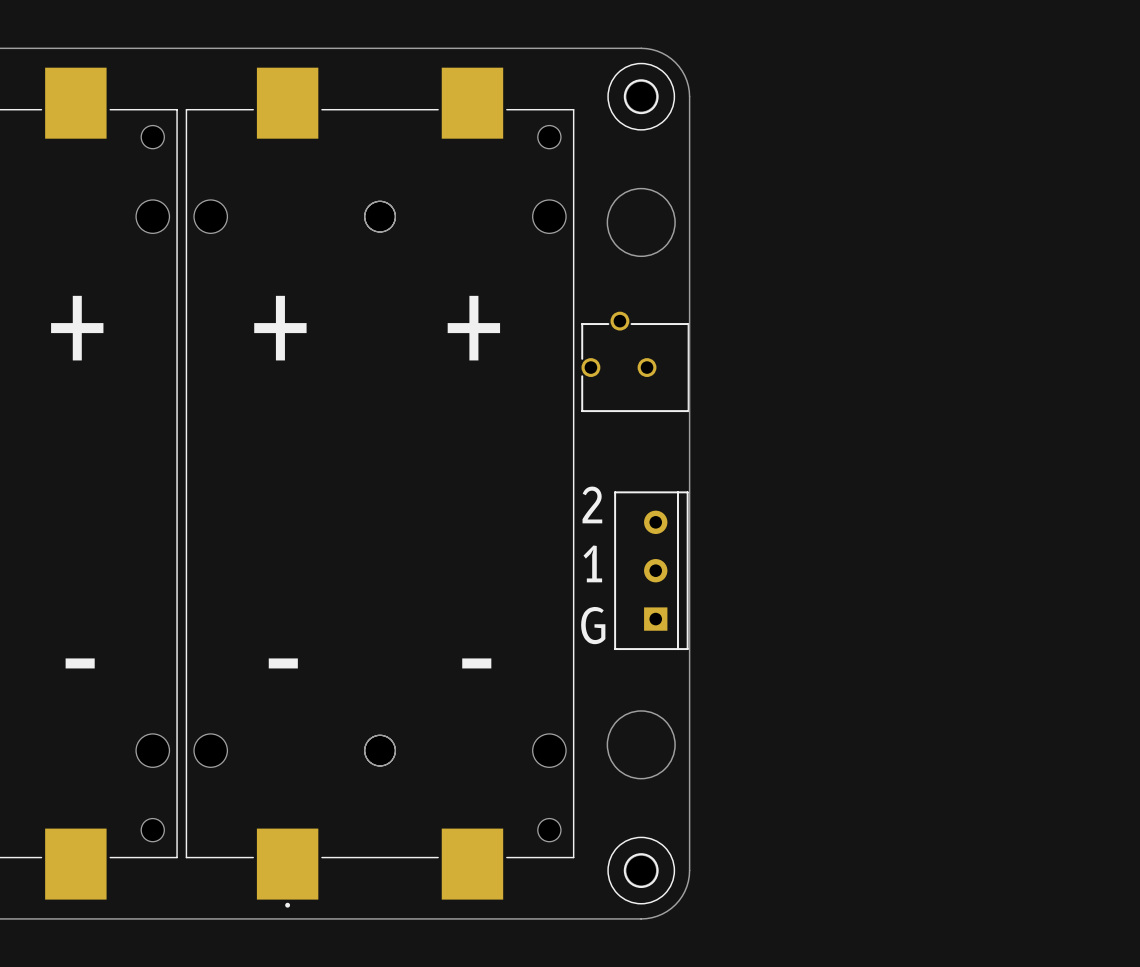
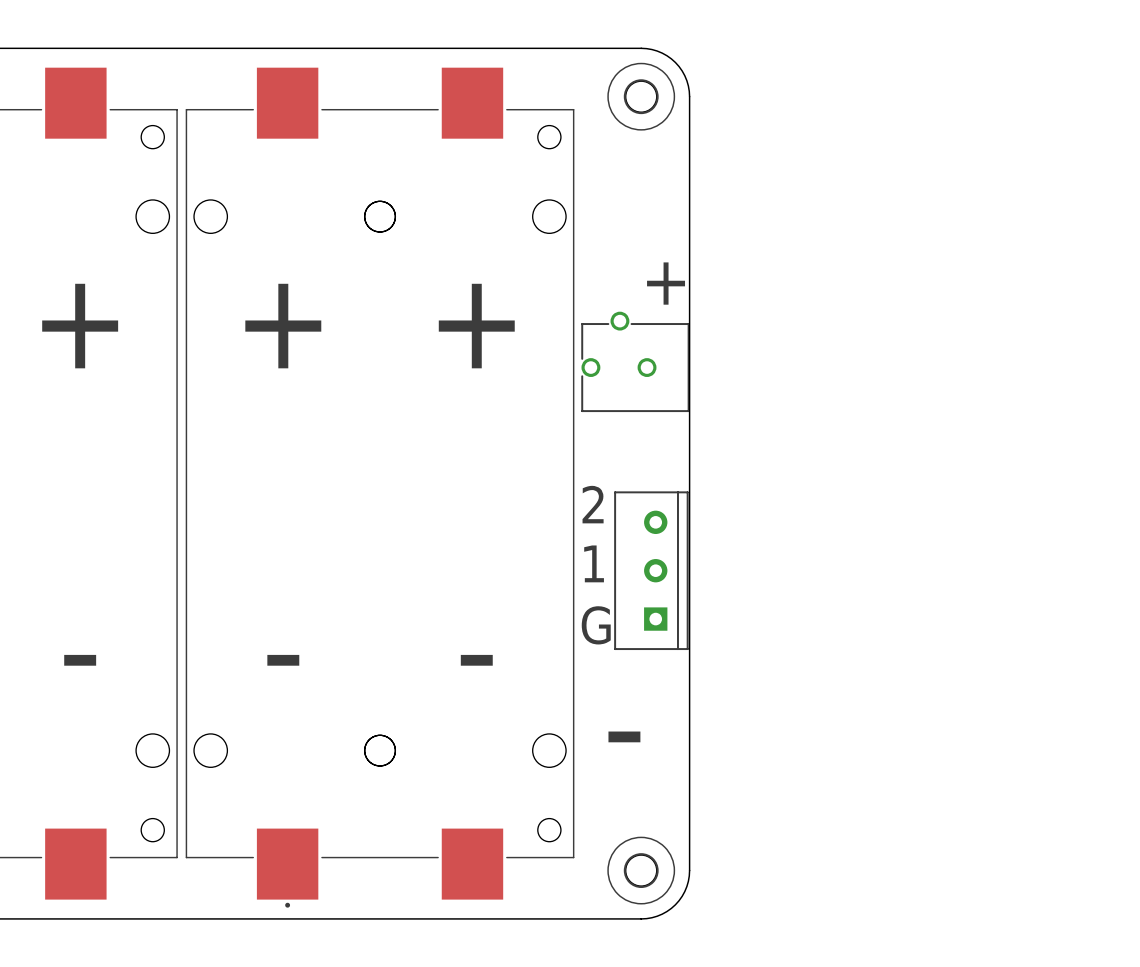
round board edge: [606, 187, 676, 258] -> none
text: none -> + (666, 283)
round board edge: [606, 710, 676, 780] -> none
text: none -> - (624, 736)

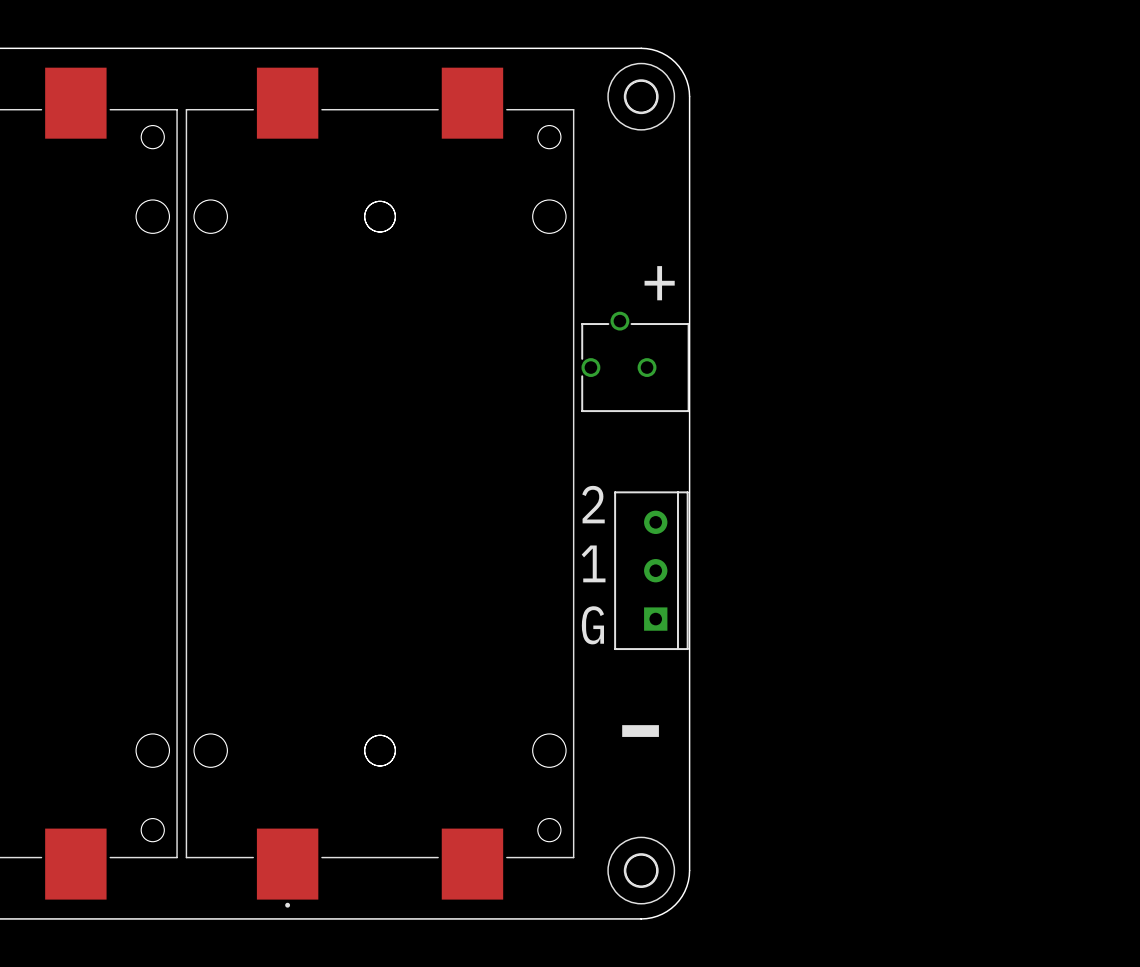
text: + (80, 326) -> none
text: + (283, 326) -> none
text: + (476, 326) -> none
text: - (80, 660) -> none
text: - (283, 660) -> none
text: - (476, 660) -> none

